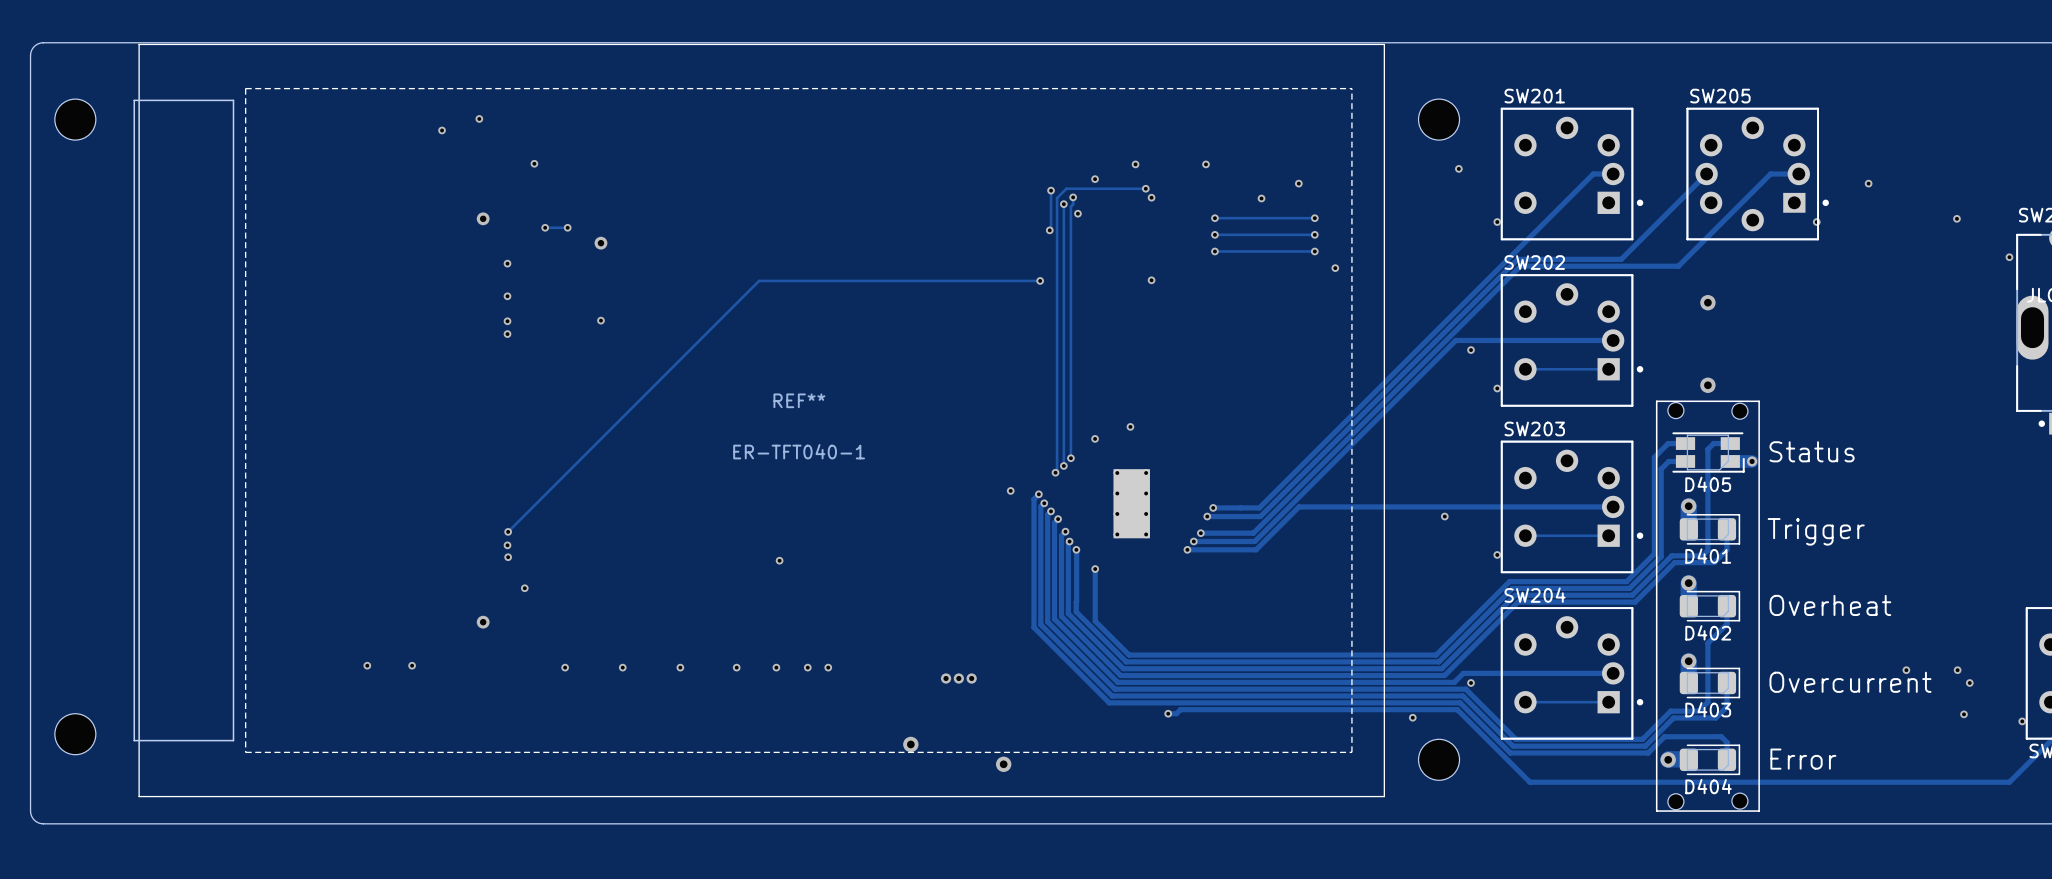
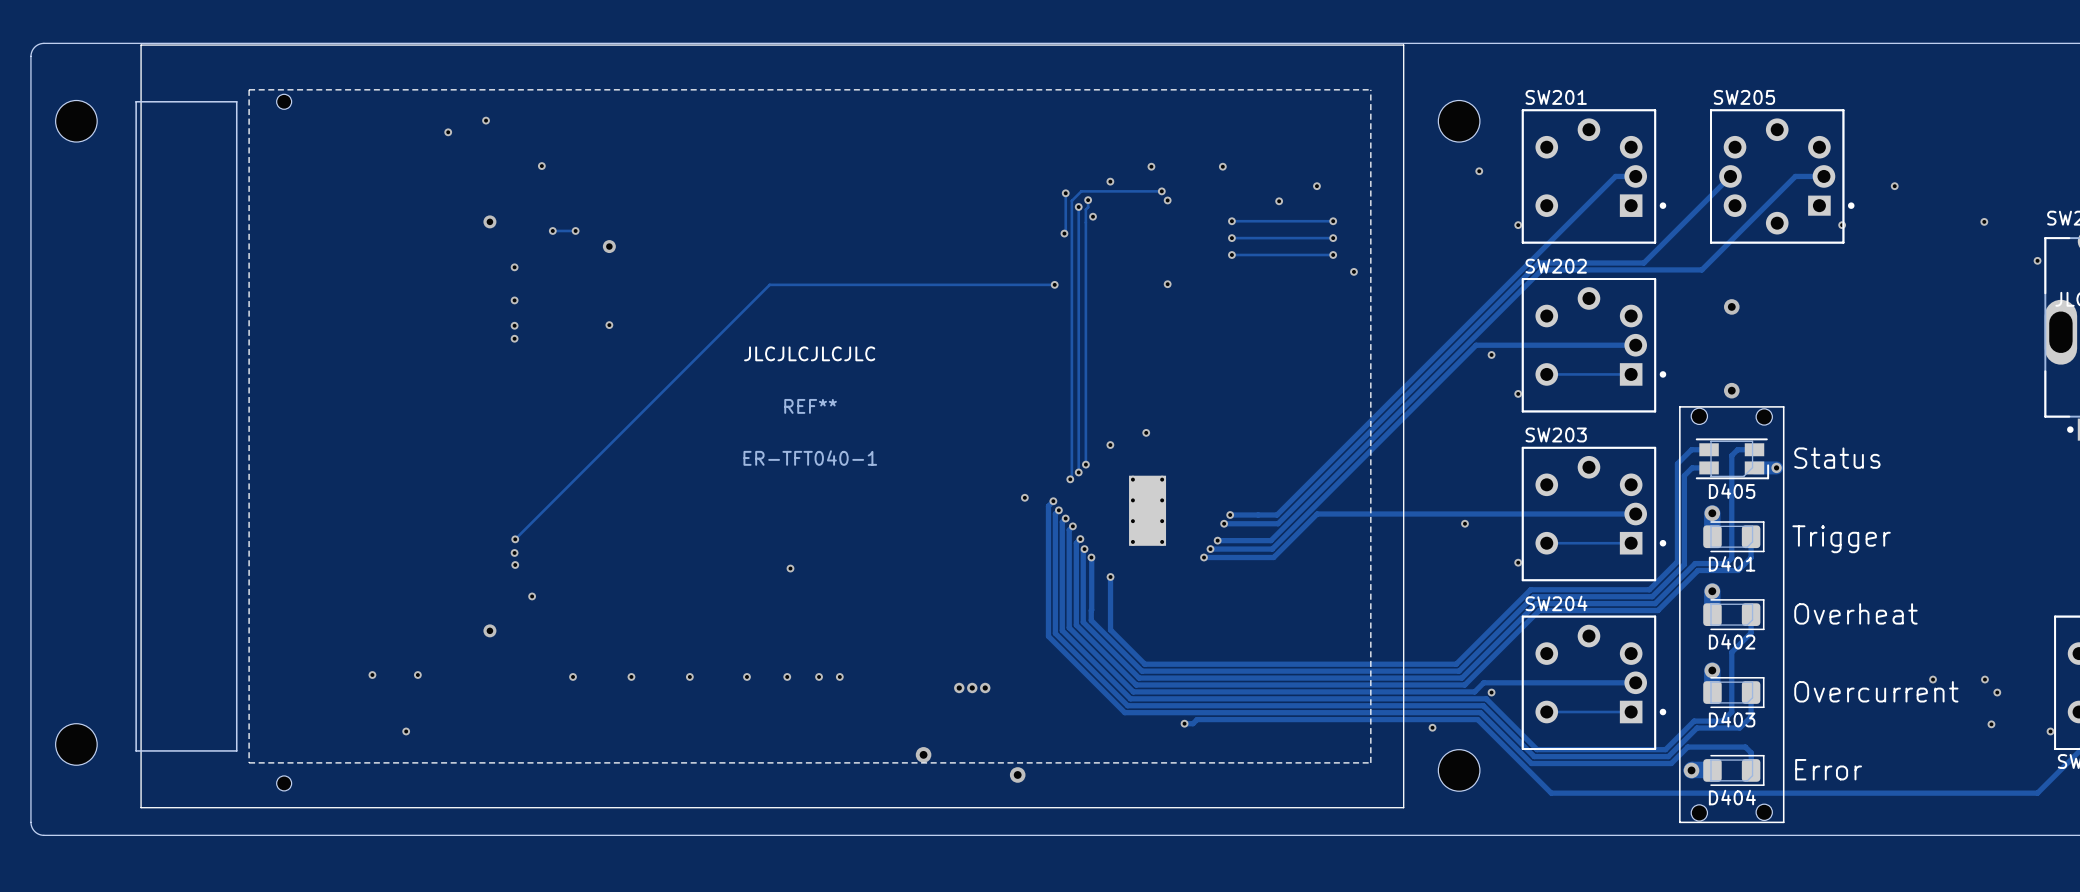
part: none -> (284, 101)
text: none -> JLCJLCJLCJLC (809, 353)
via: none -> (406, 731)
part: none -> (284, 783)

